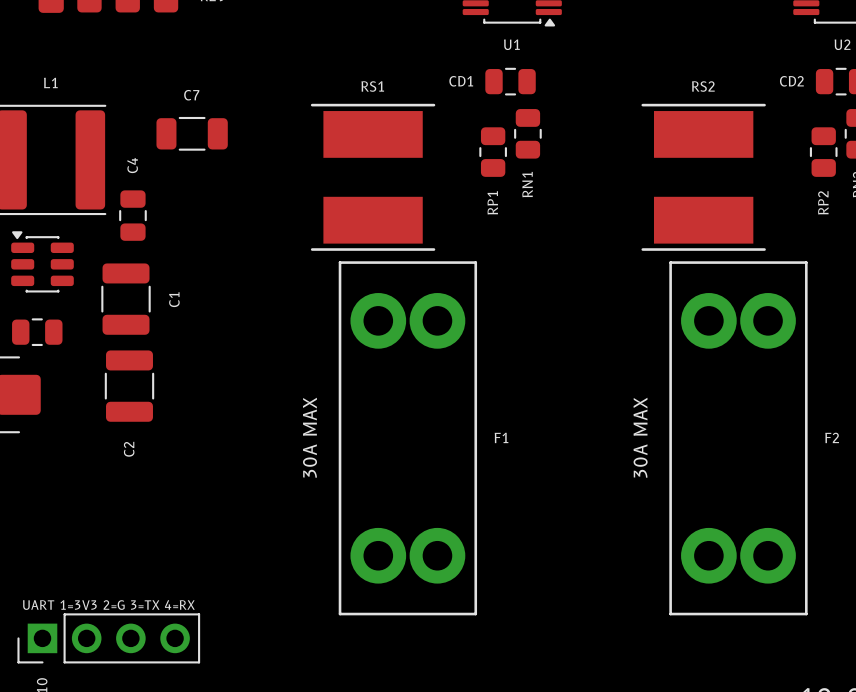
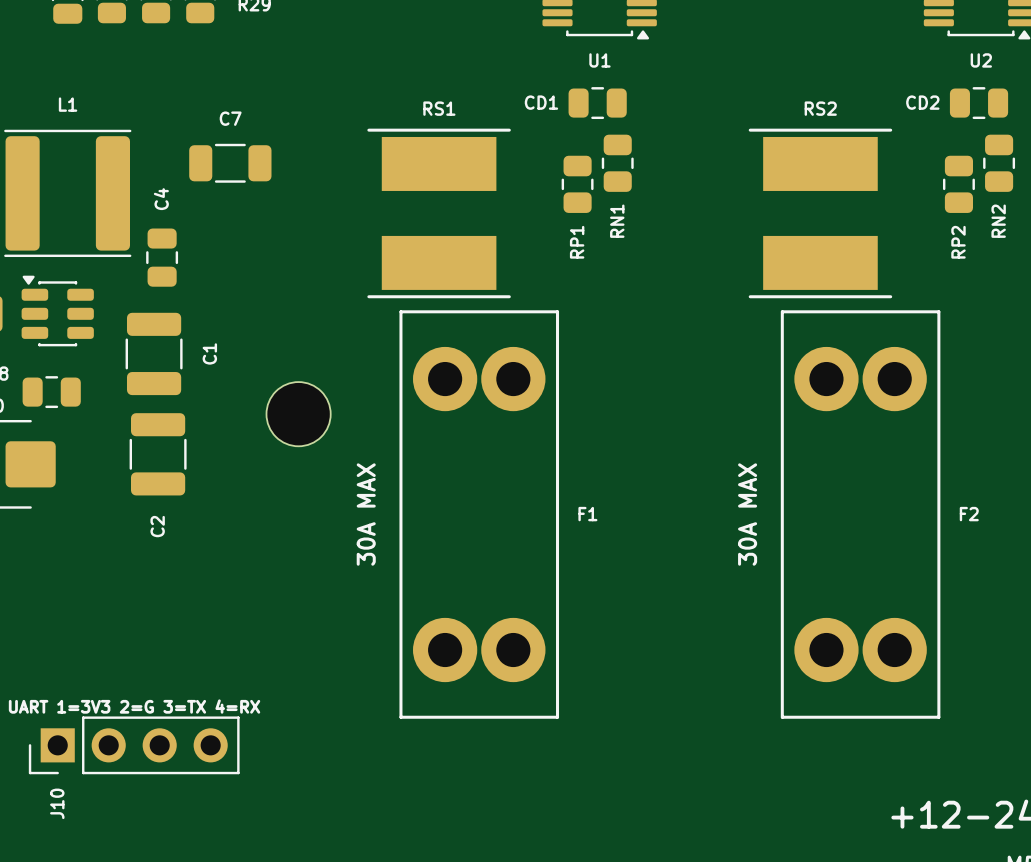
part: none -> (298, 414)

